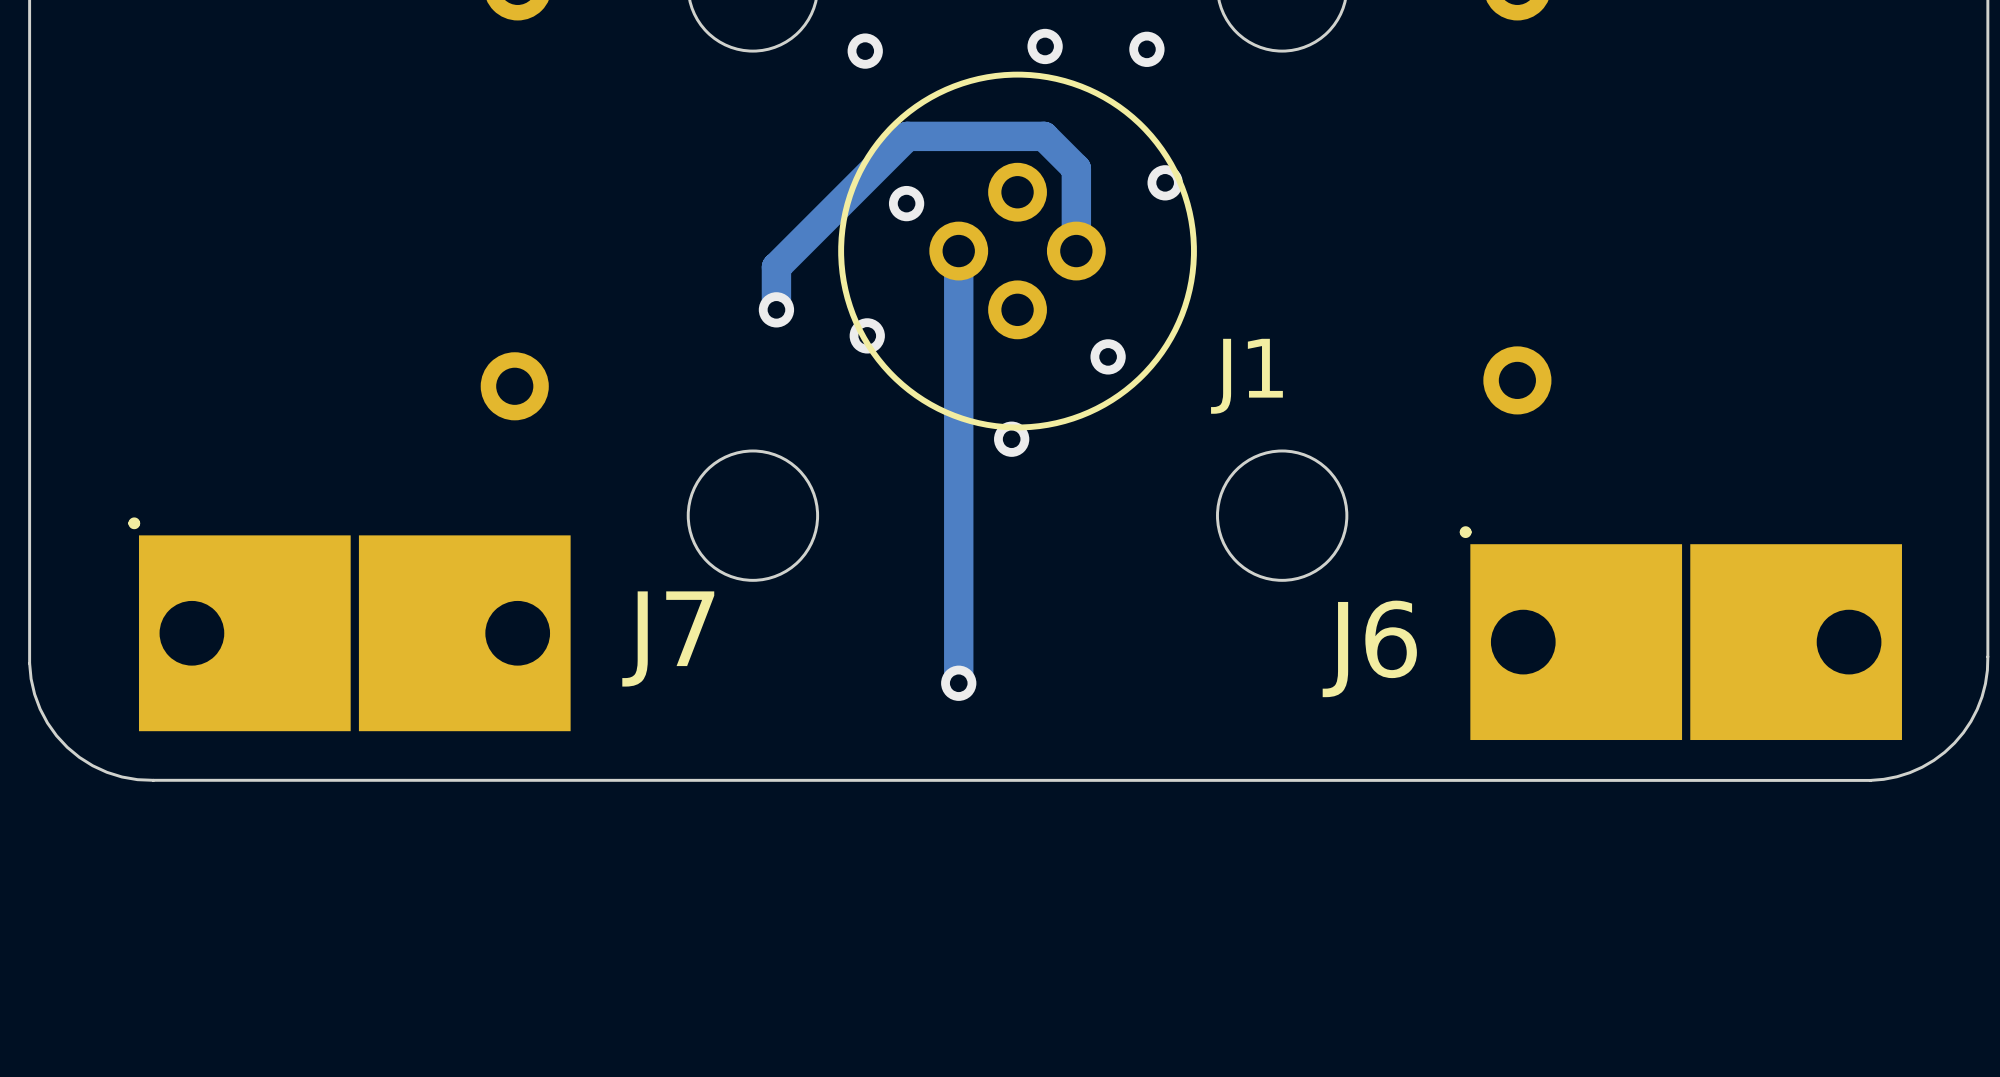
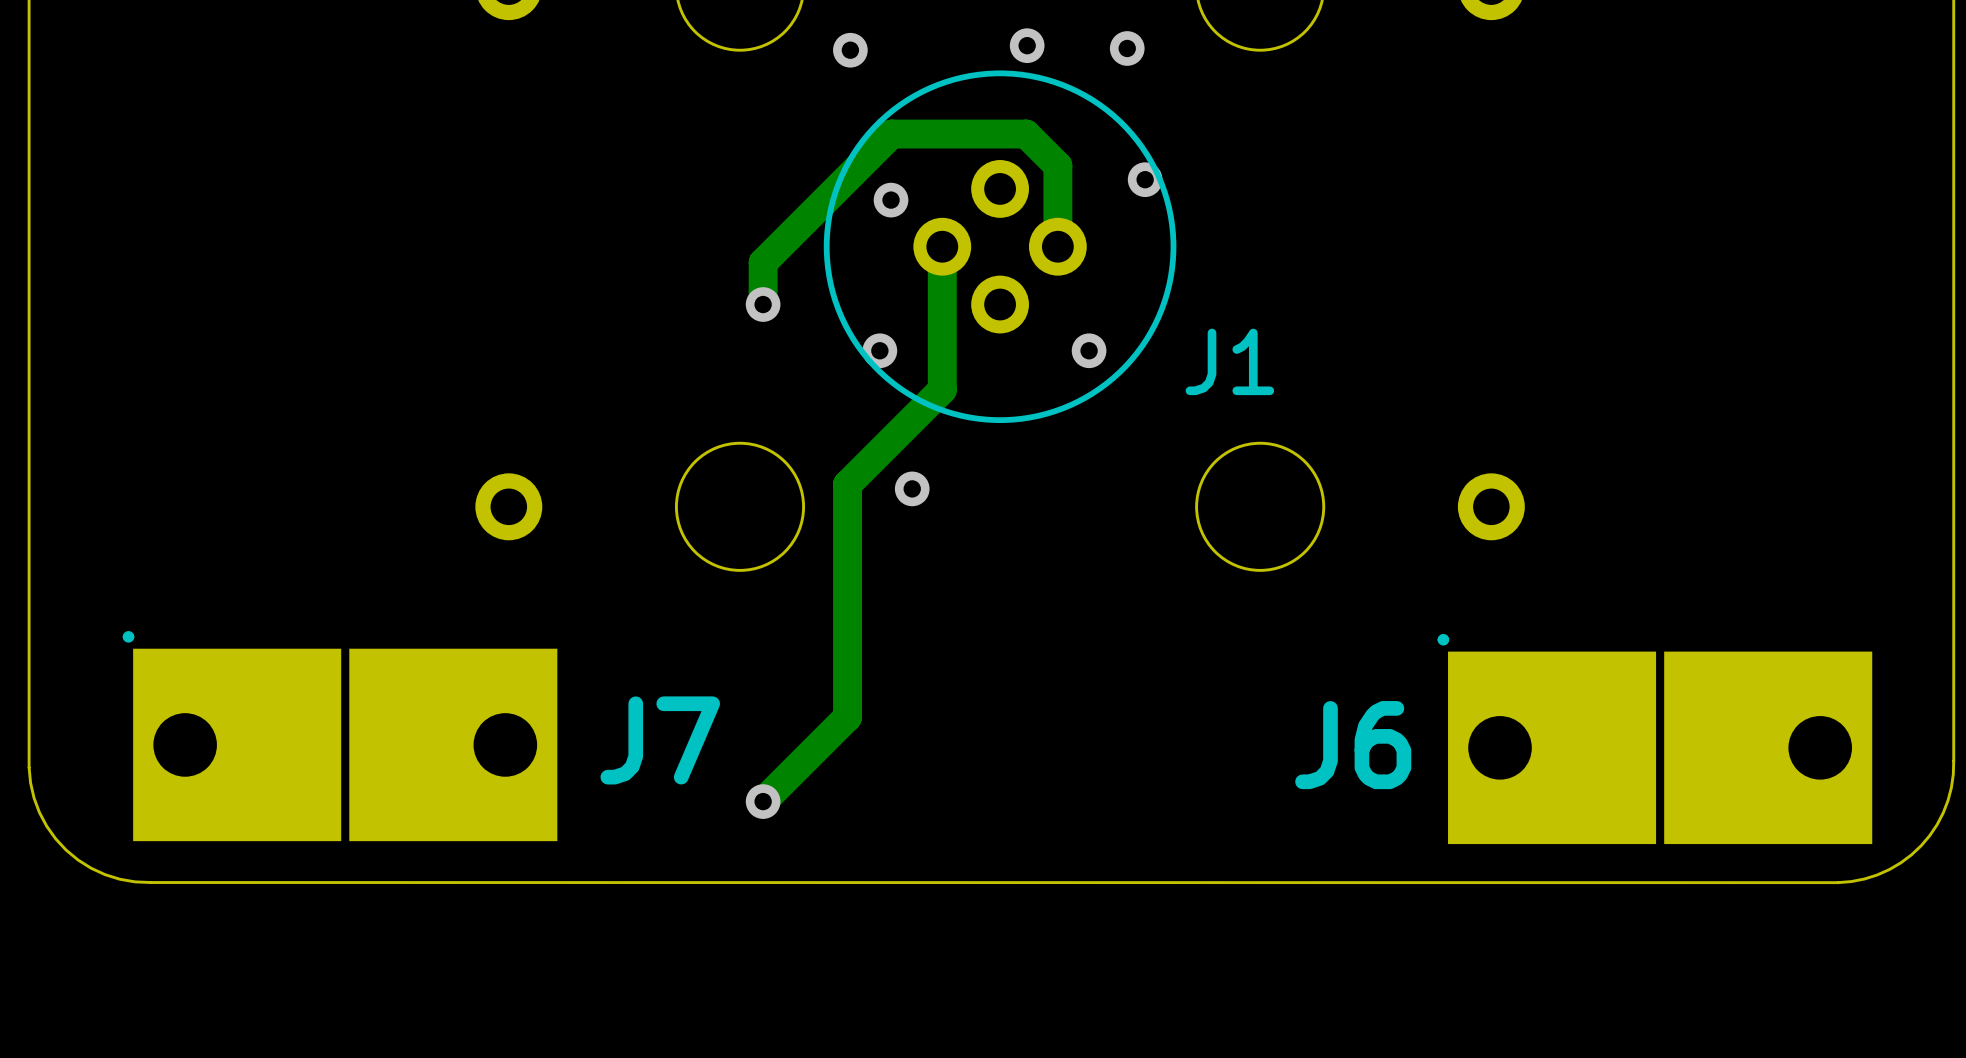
via position: (867, 335) -> (879, 350)
part position: (1517, 380) -> (1491, 506)
part position: (514, 386) -> (508, 506)
track: (958, 396) (958, 683) -> (942, 389) (847, 484) (847, 717) (763, 801)
via: (1011, 439) -> none
via: none -> (912, 488)
J7 position: (349, 624) -> (340, 736)
J6 position: (1680, 633) -> (1654, 739)
board edge: (1987, 656) (1987, 670) (1982, 696) (1970, 721) (1954, 742) (1944, 752) (1922, 767) (1896, 776) (1870, 780) (137, 779) (106, 772) (92, 765) (67, 747) (47, 722) (40, 709) (34, 694) (29, 663) -> (1953, 645) (1953, 774) (1943, 812) (1921, 845) (1900, 862) (1864, 879) (1838, 882) (135, 881) (105, 874) (78, 859) (55, 838) (39, 812) (34, 797) (29, 767) (29, 651)
via: (958, 683) -> none
via: none -> (763, 801)

